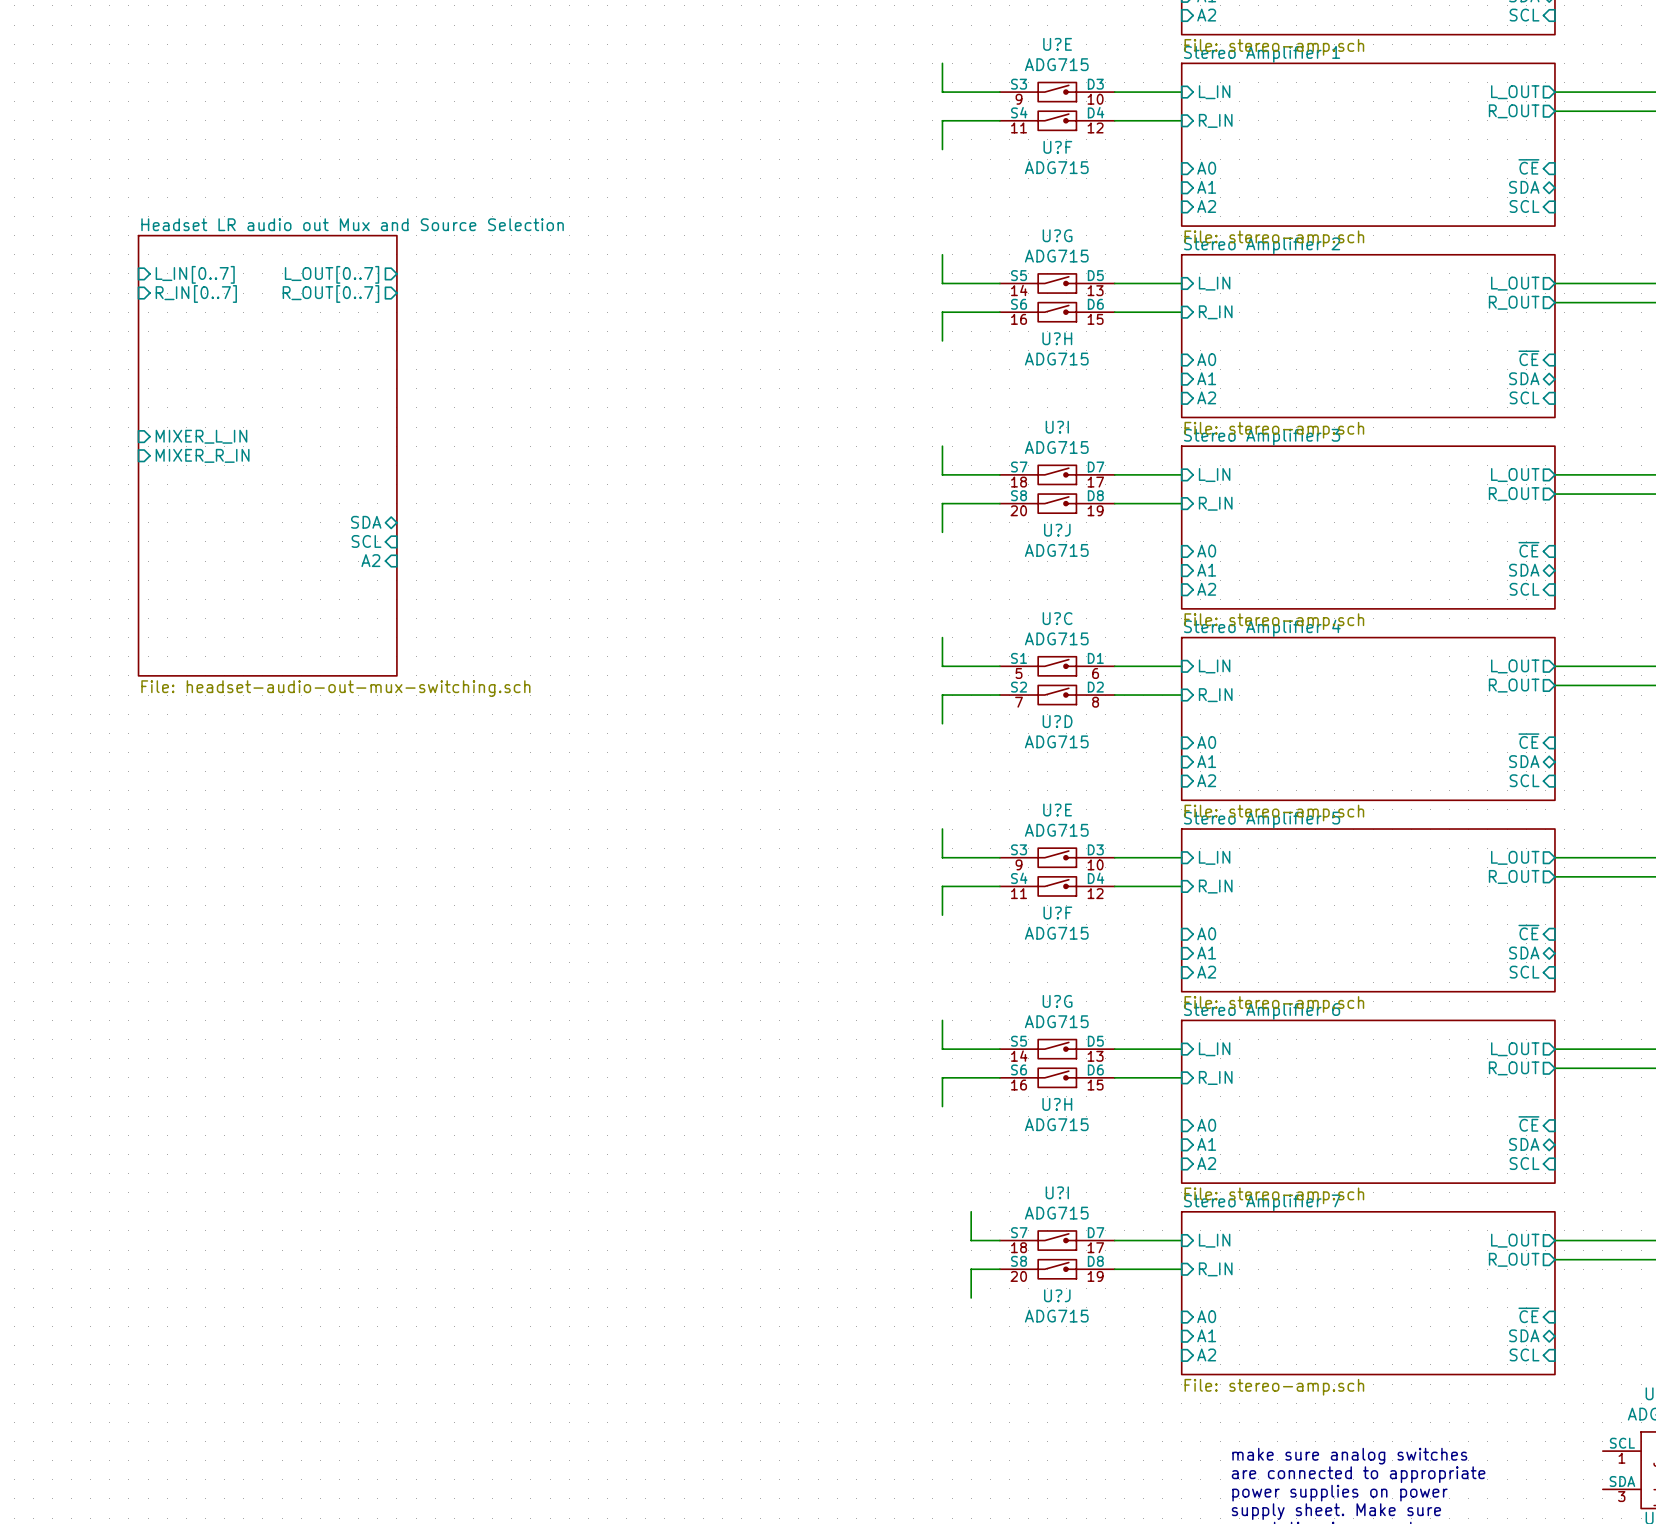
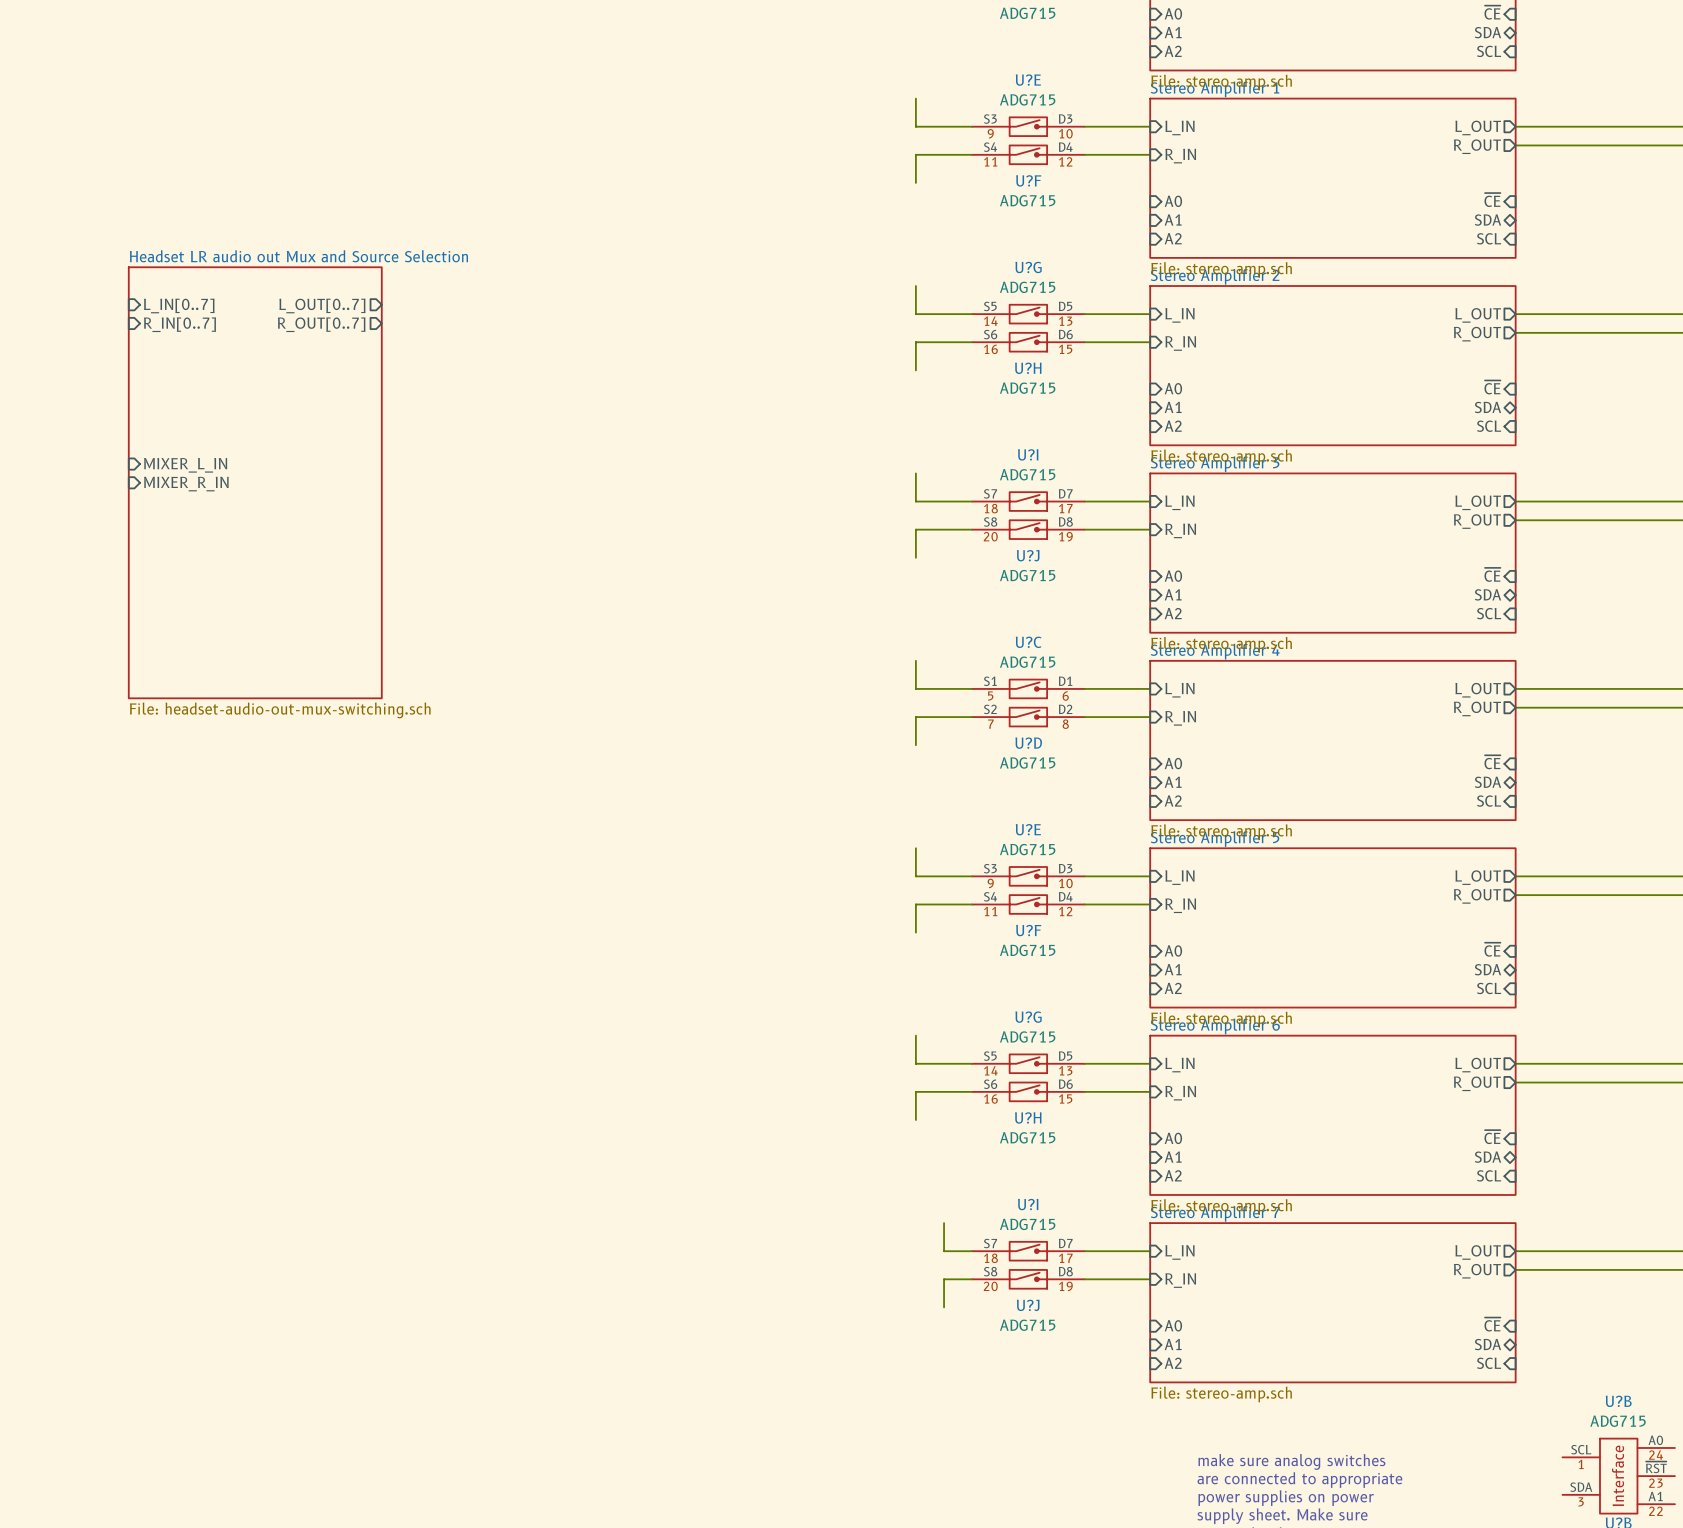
sheet pin: SDA (366, 522) -> none
sheet pin: SCL (366, 541) -> none
sheet pin: A2 (370, 560) -> none

